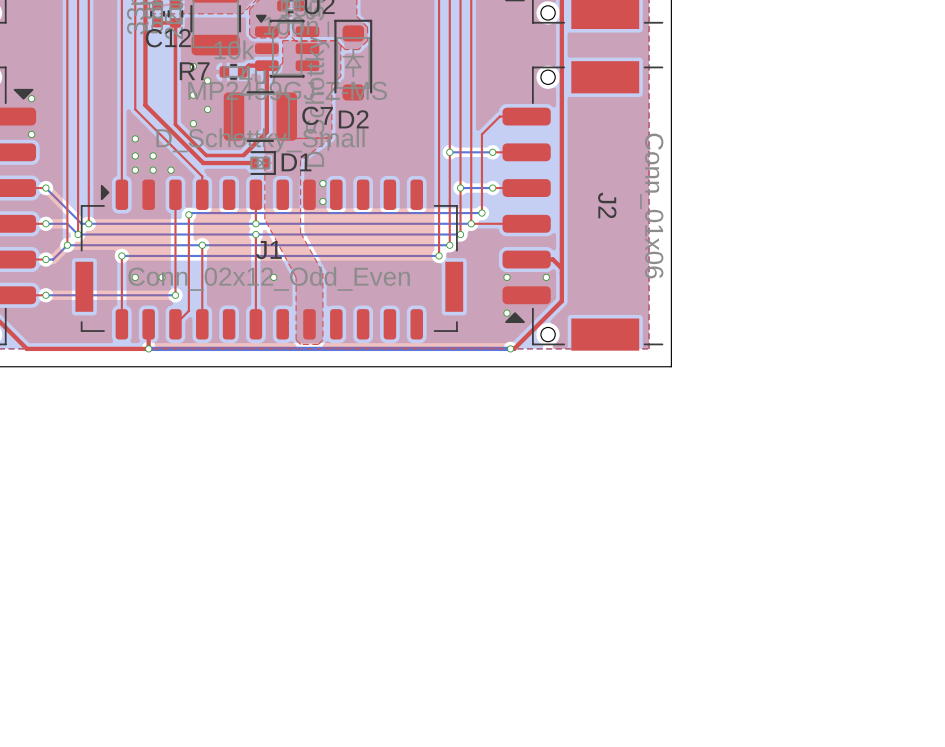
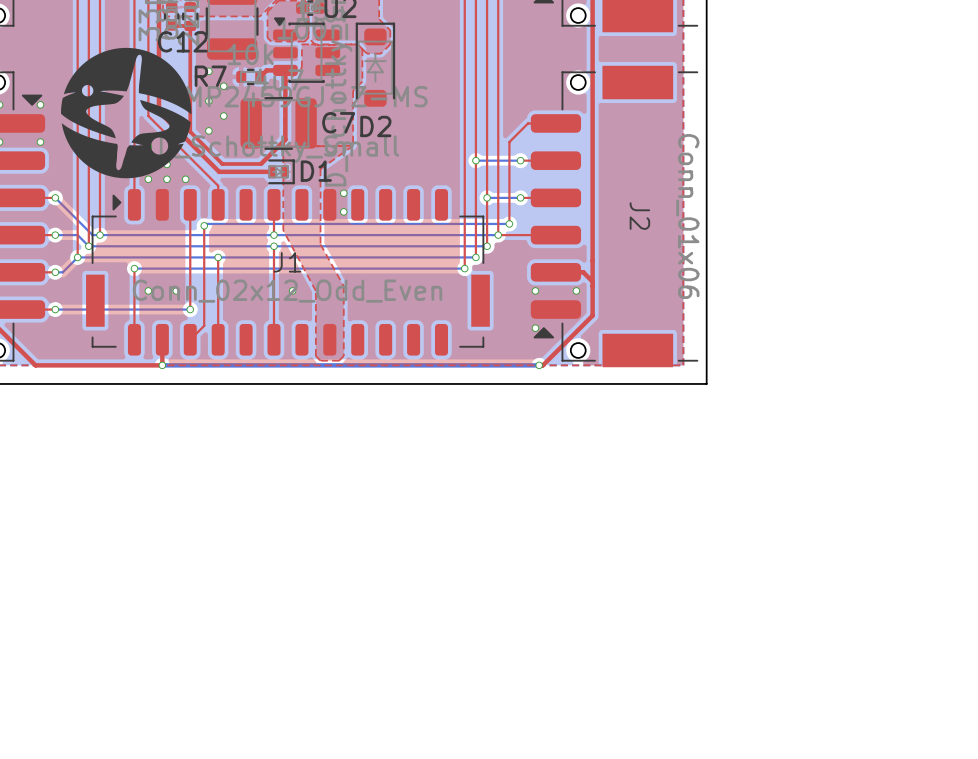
drawing: none -> [61, 47, 192, 179]

